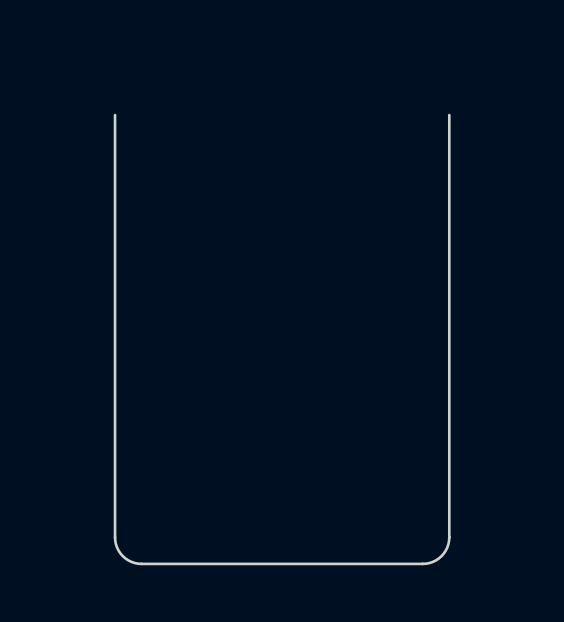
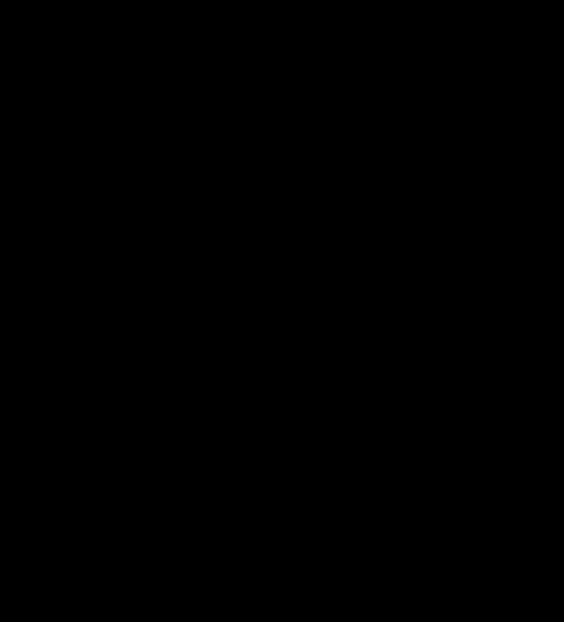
part: (282, 339) -> none

